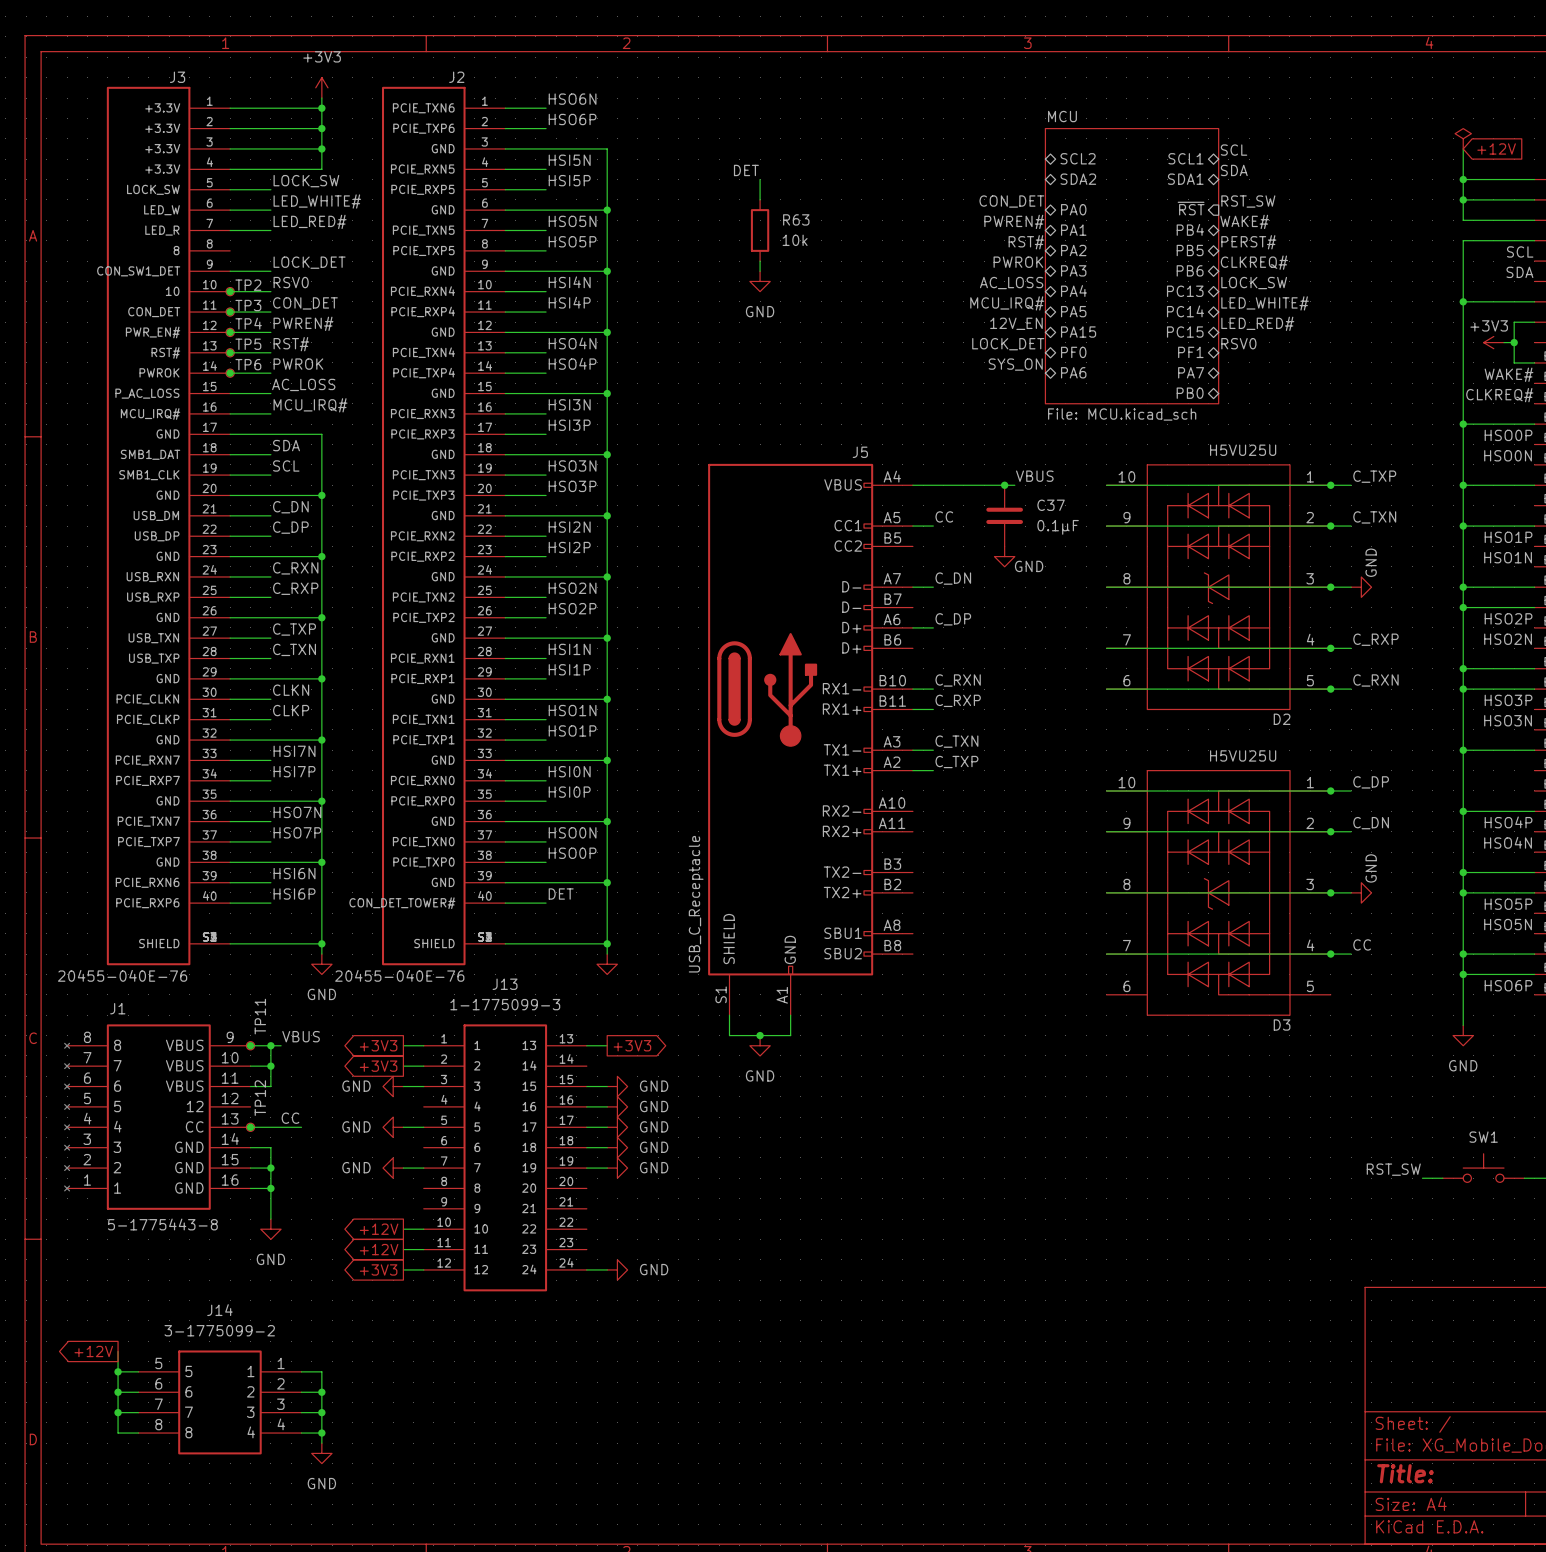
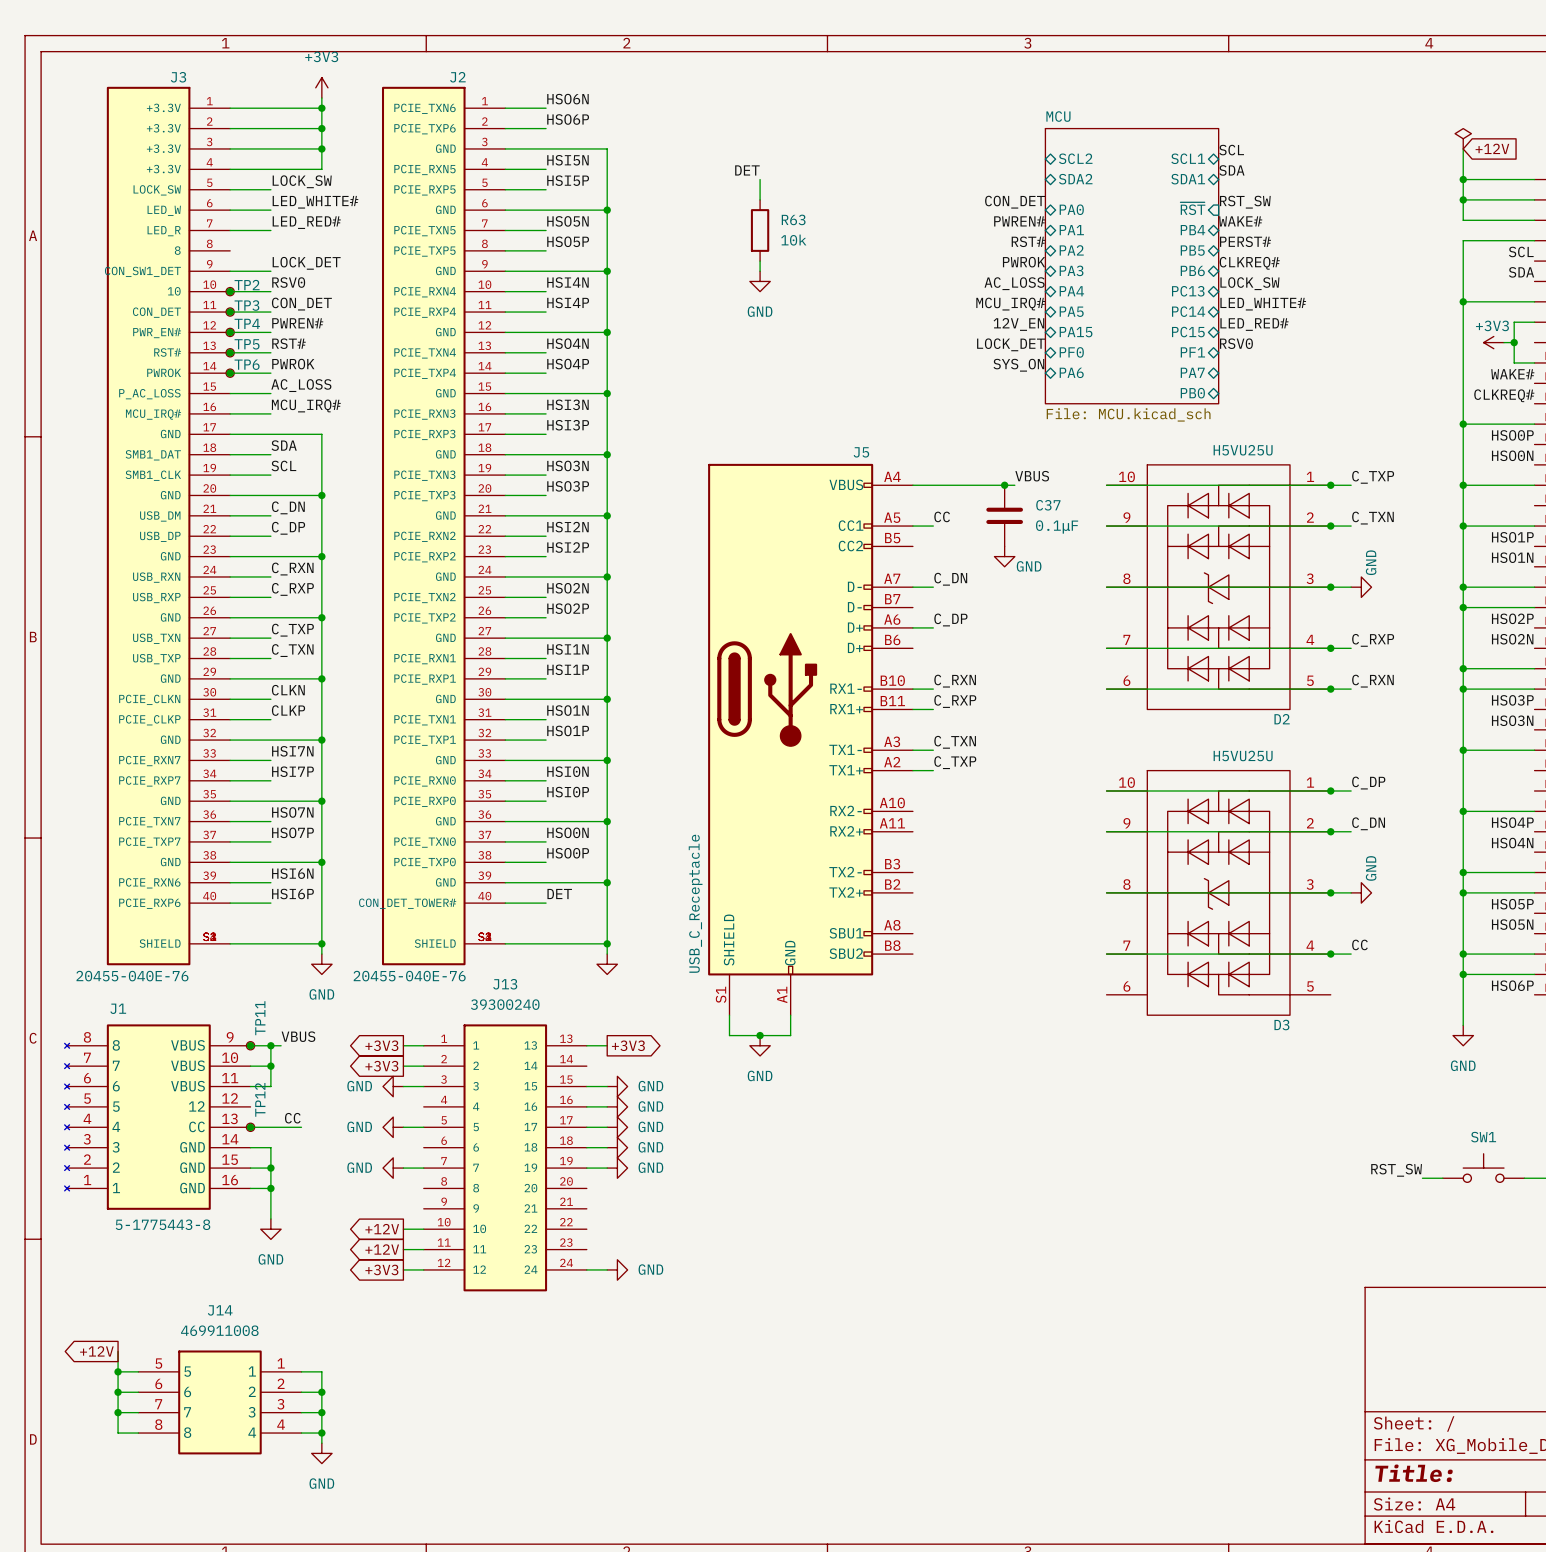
J13 value: 1-1775099-3 (505, 1004) -> 39300240 (505, 1004)
J14 value: 3-1775099-2 (219, 1330) -> 469911008 (219, 1330)

